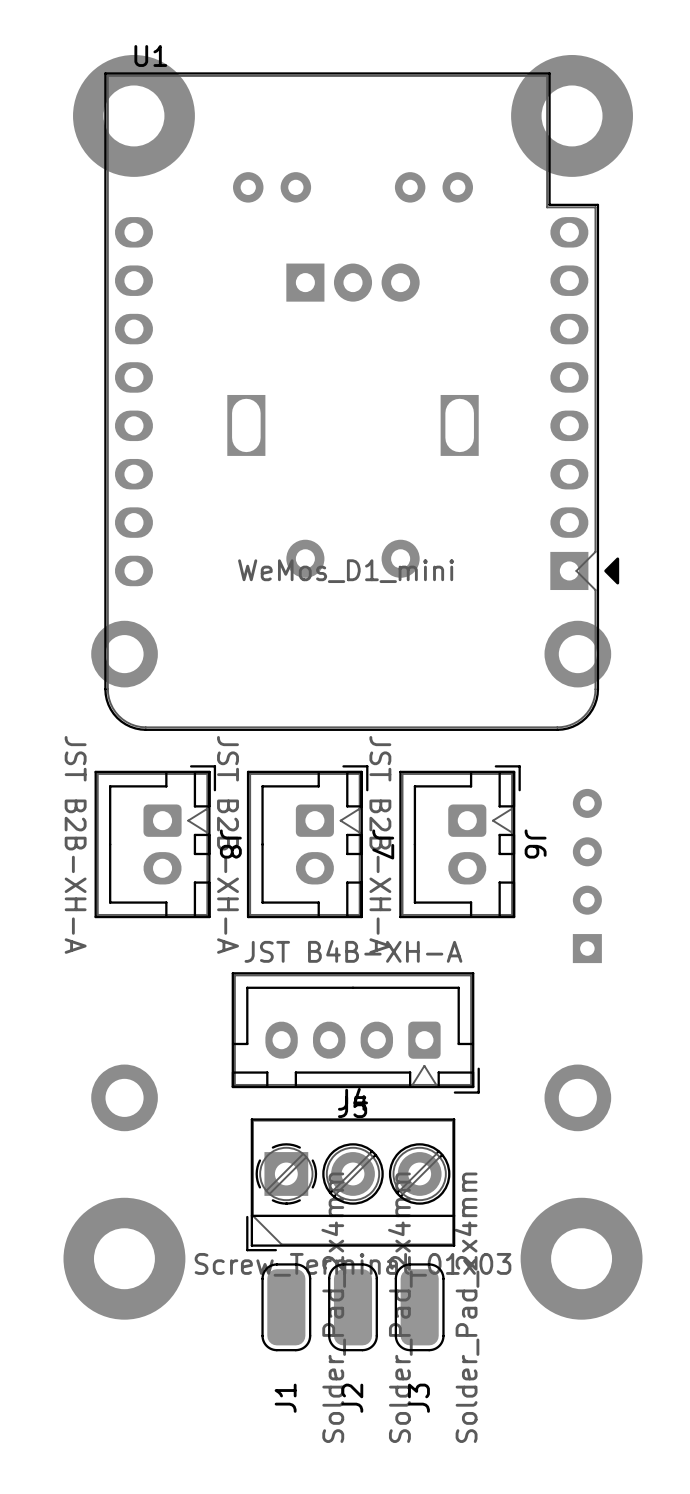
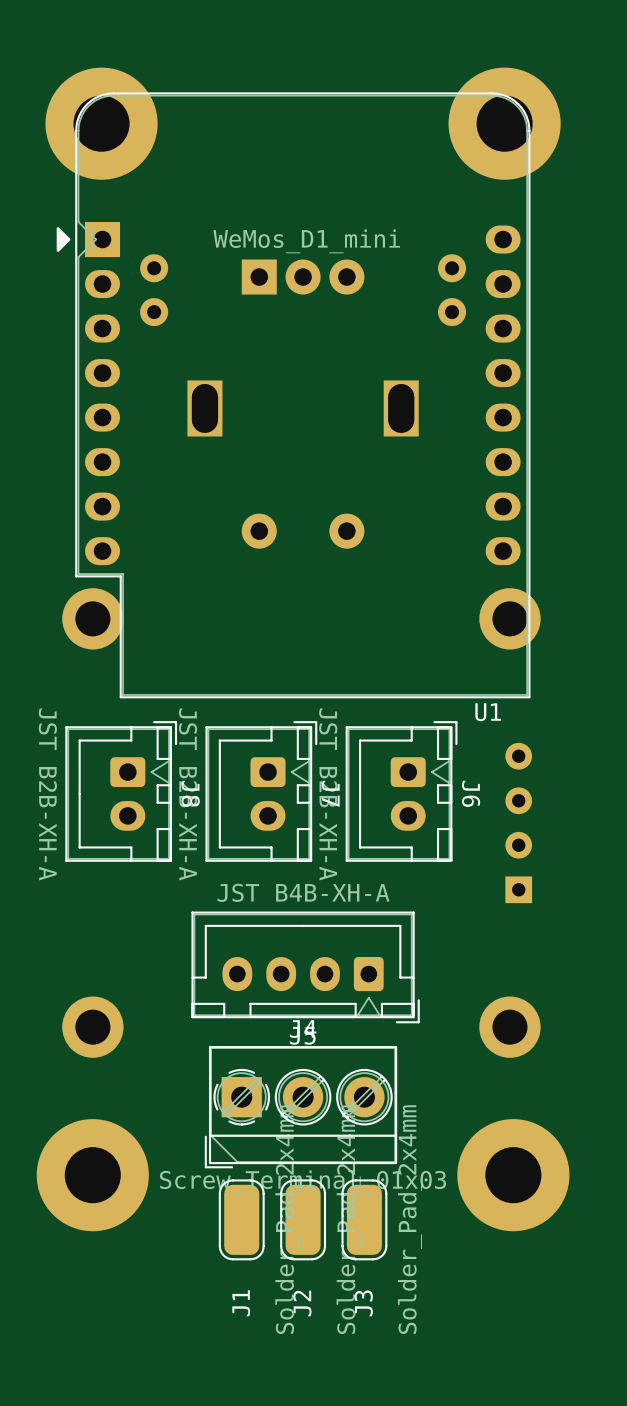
part: (272, 187) -> none
part: (433, 187) -> none
part: none -> (154, 290)
part: none -> (452, 290)
U1 rotation: 0° (361, 401) -> 180° (293, 395)

